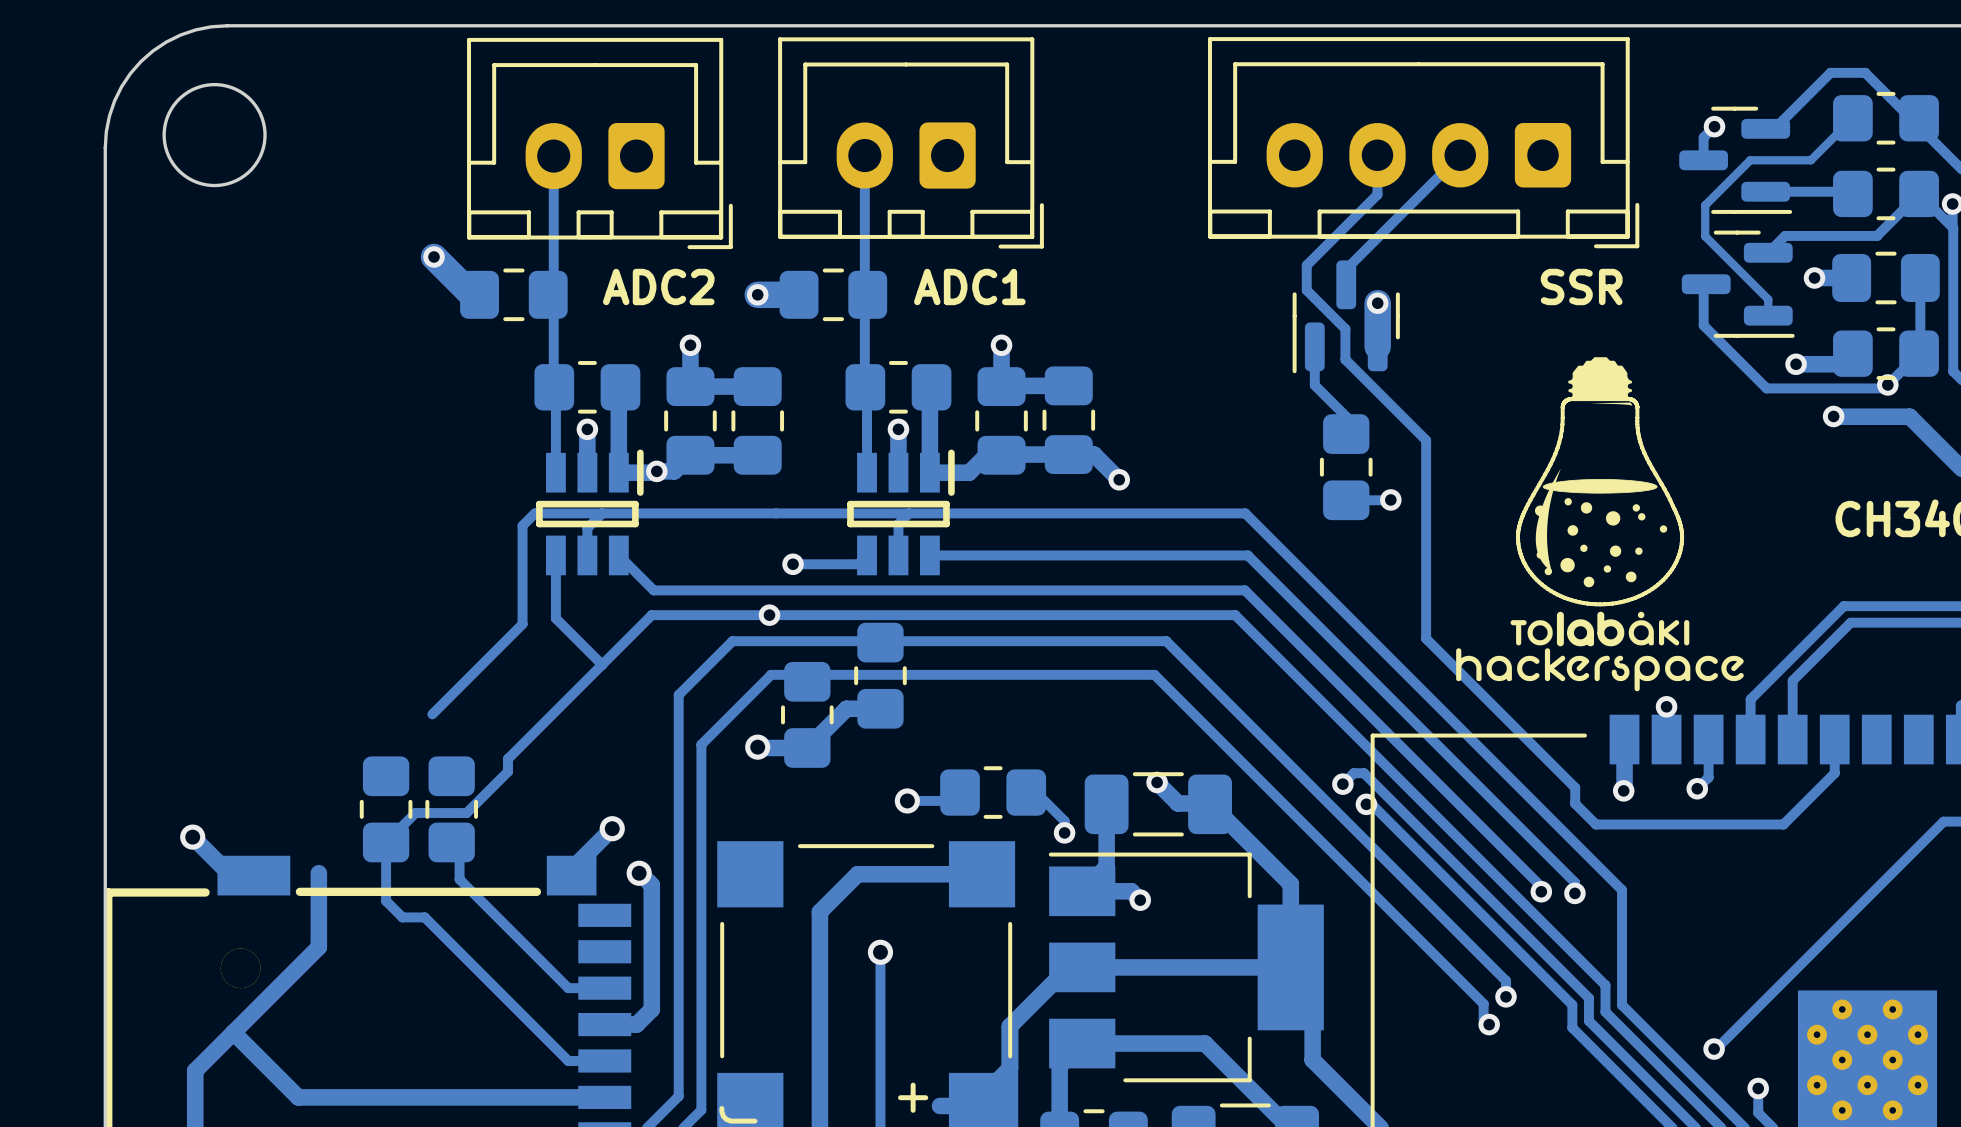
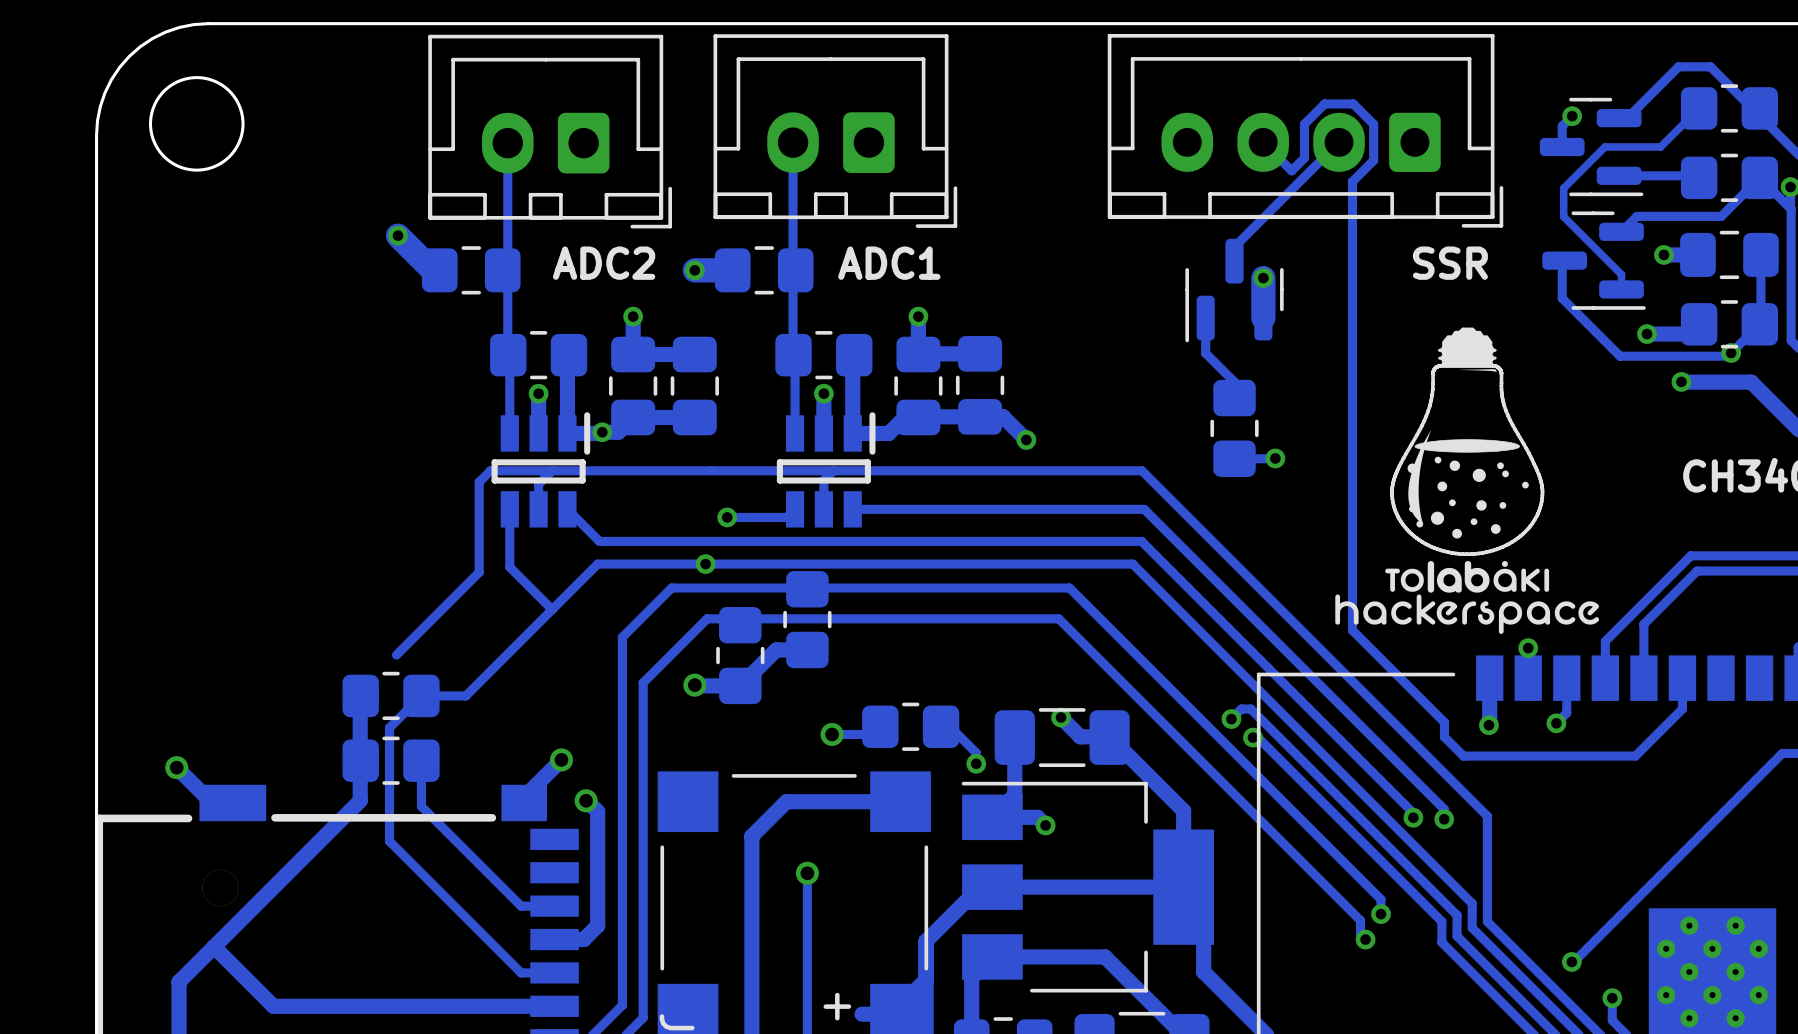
track: (1377, 155) (1377, 194) (1306, 265) (1306, 290) (1345, 328) (1345, 359) (1426, 440) (1426, 638) (1474, 687) -> (1263, 142) (1291, 170) (1304, 158) (1304, 124) (1324, 103) (1353, 103) (1373, 124) (1373, 160) (1352, 181) (1352, 630)
part: none -> (391, 695)
track: (508, 758) (508, 771) (466, 813) (415, 813) (386, 842) (386, 901) (402, 917) (424, 917) -> (465, 695) (421, 695) (389, 727) (389, 841)
part: (386, 809) -> none
part: (451, 809) -> none
part: none -> (391, 760)
track: (318, 873) (318, 947) -> (360, 702) (360, 800) (292, 868)

